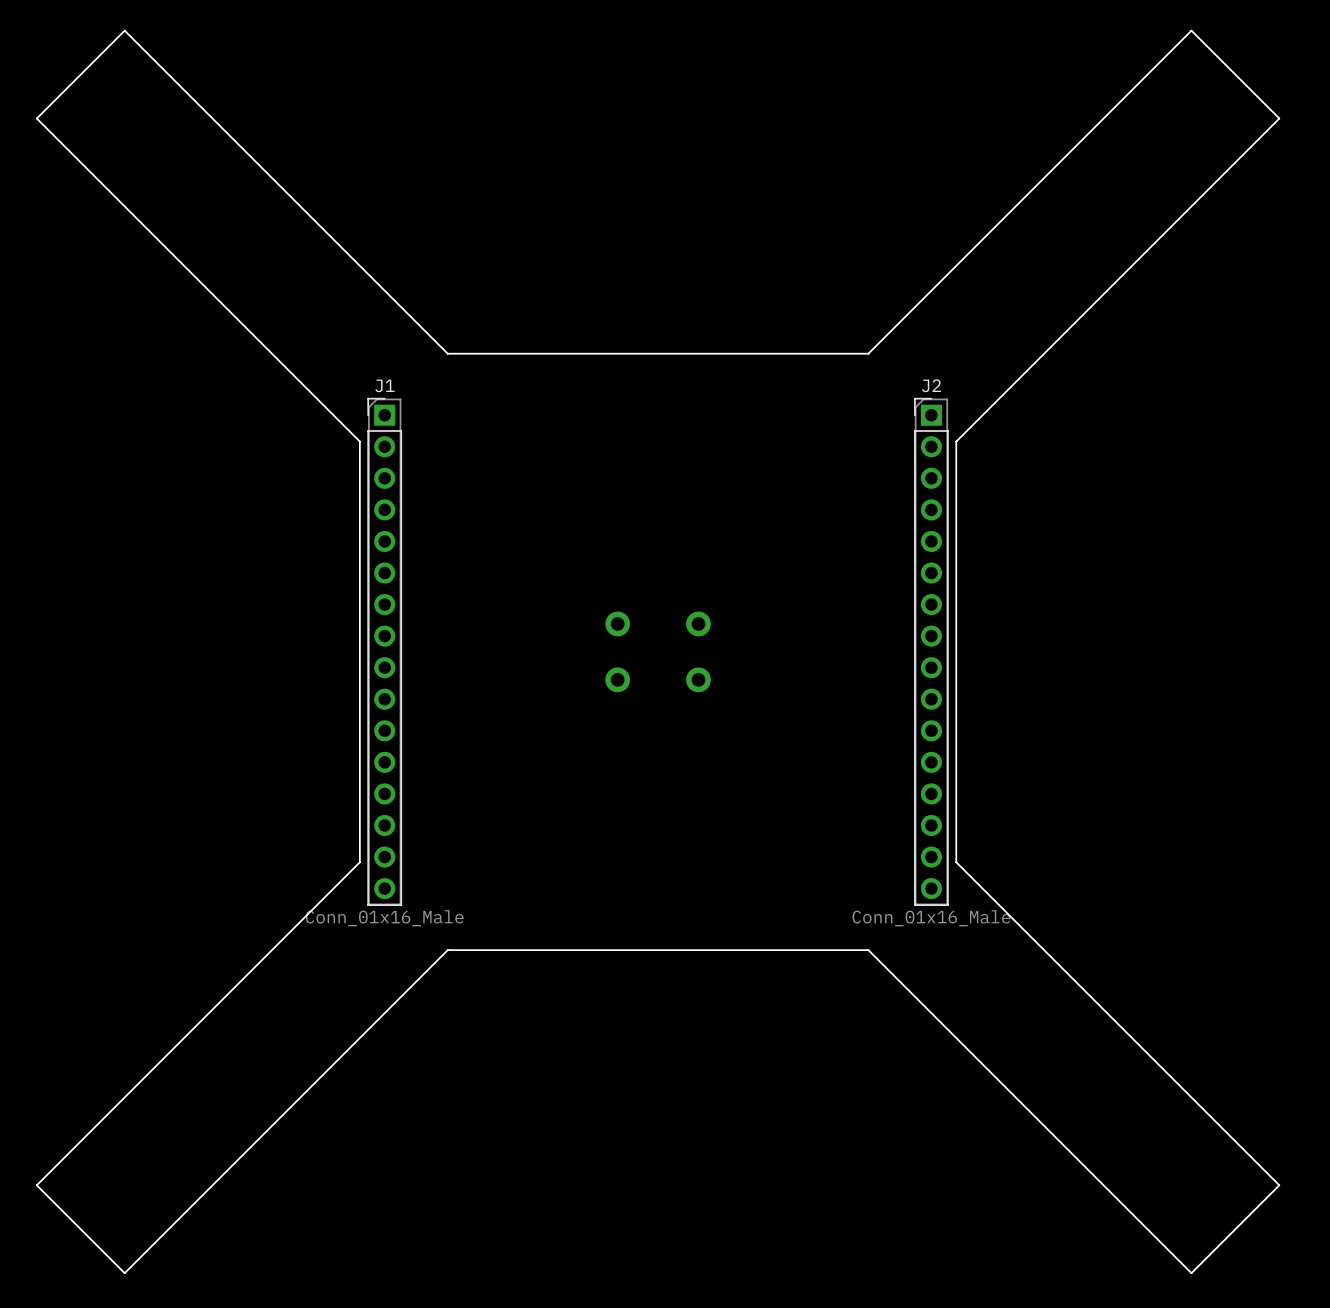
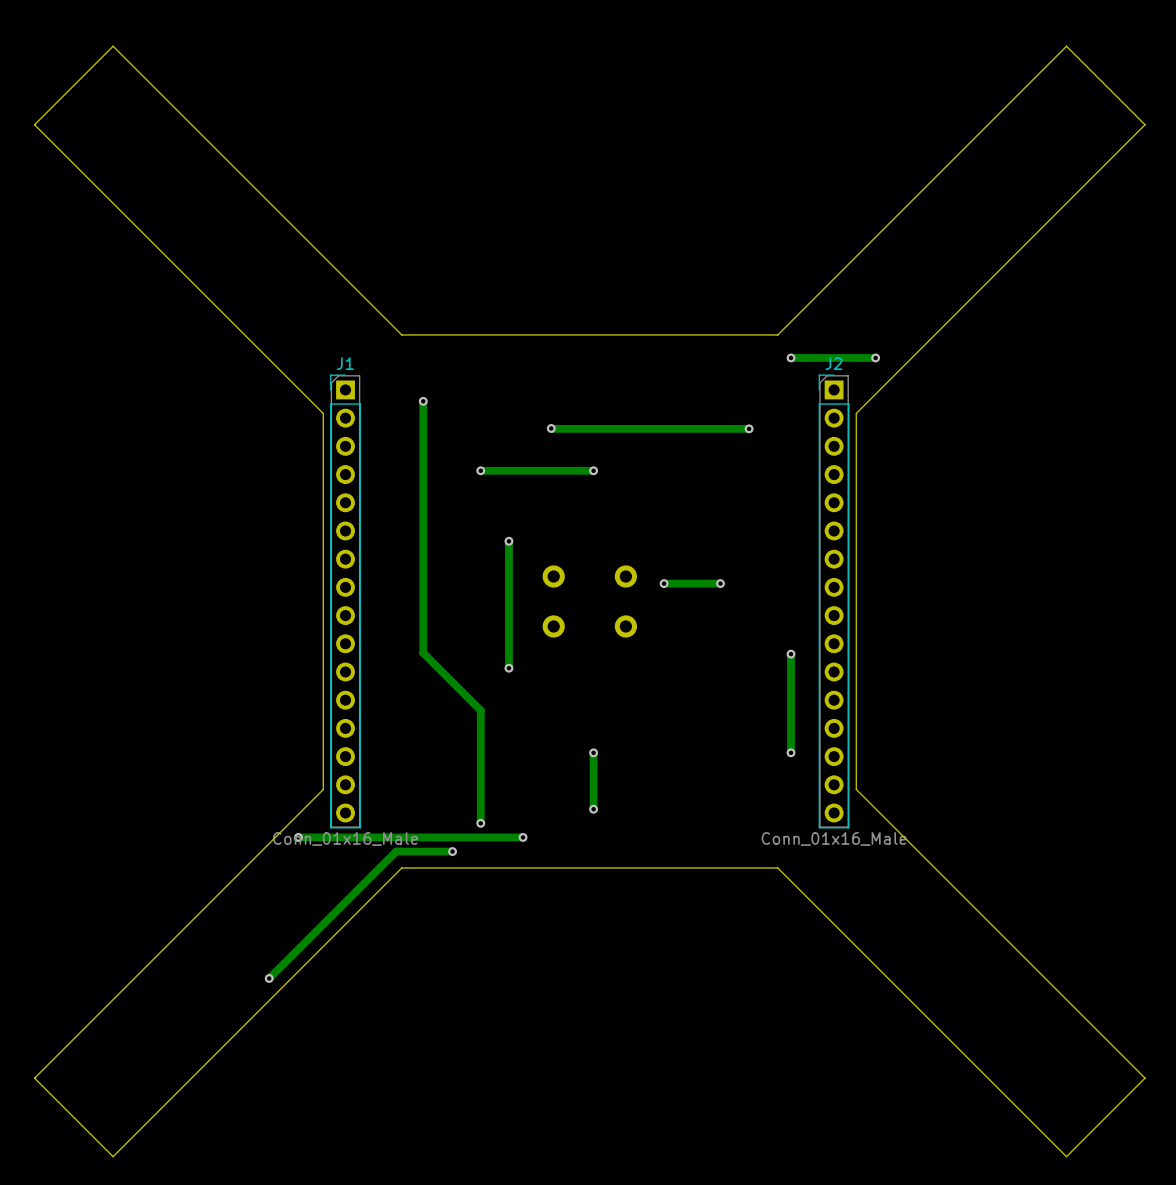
via: none -> (791, 357)
track: none -> (875, 357) (791, 357)
via: none -> (875, 357)
track: none -> (423, 401) (423, 653) (480, 710) (480, 823)
via: none -> (423, 401)
track: none -> (551, 428) (749, 428)
via: none -> (551, 428)
via: none -> (749, 428)
via: none -> (480, 470)
track: none -> (593, 470) (480, 470)
via: none -> (593, 470)
track: none -> (508, 541) (508, 668)
via: none -> (508, 541)
via: none -> (664, 583)
track: none -> (720, 583) (664, 583)
via: none -> (720, 583)
track: none -> (791, 654) (791, 752)
via: none -> (791, 654)
via: none -> (508, 668)
track: none -> (593, 752) (593, 809)
via: none -> (593, 752)
via: none -> (791, 752)
via: none -> (593, 809)
via: none -> (480, 823)
via: none -> (298, 837)
track: none -> (523, 837) (297, 838)
via: none -> (523, 837)
track: none -> (452, 851) (396, 851) (269, 978)
via: none -> (452, 851)
via: none -> (269, 978)

